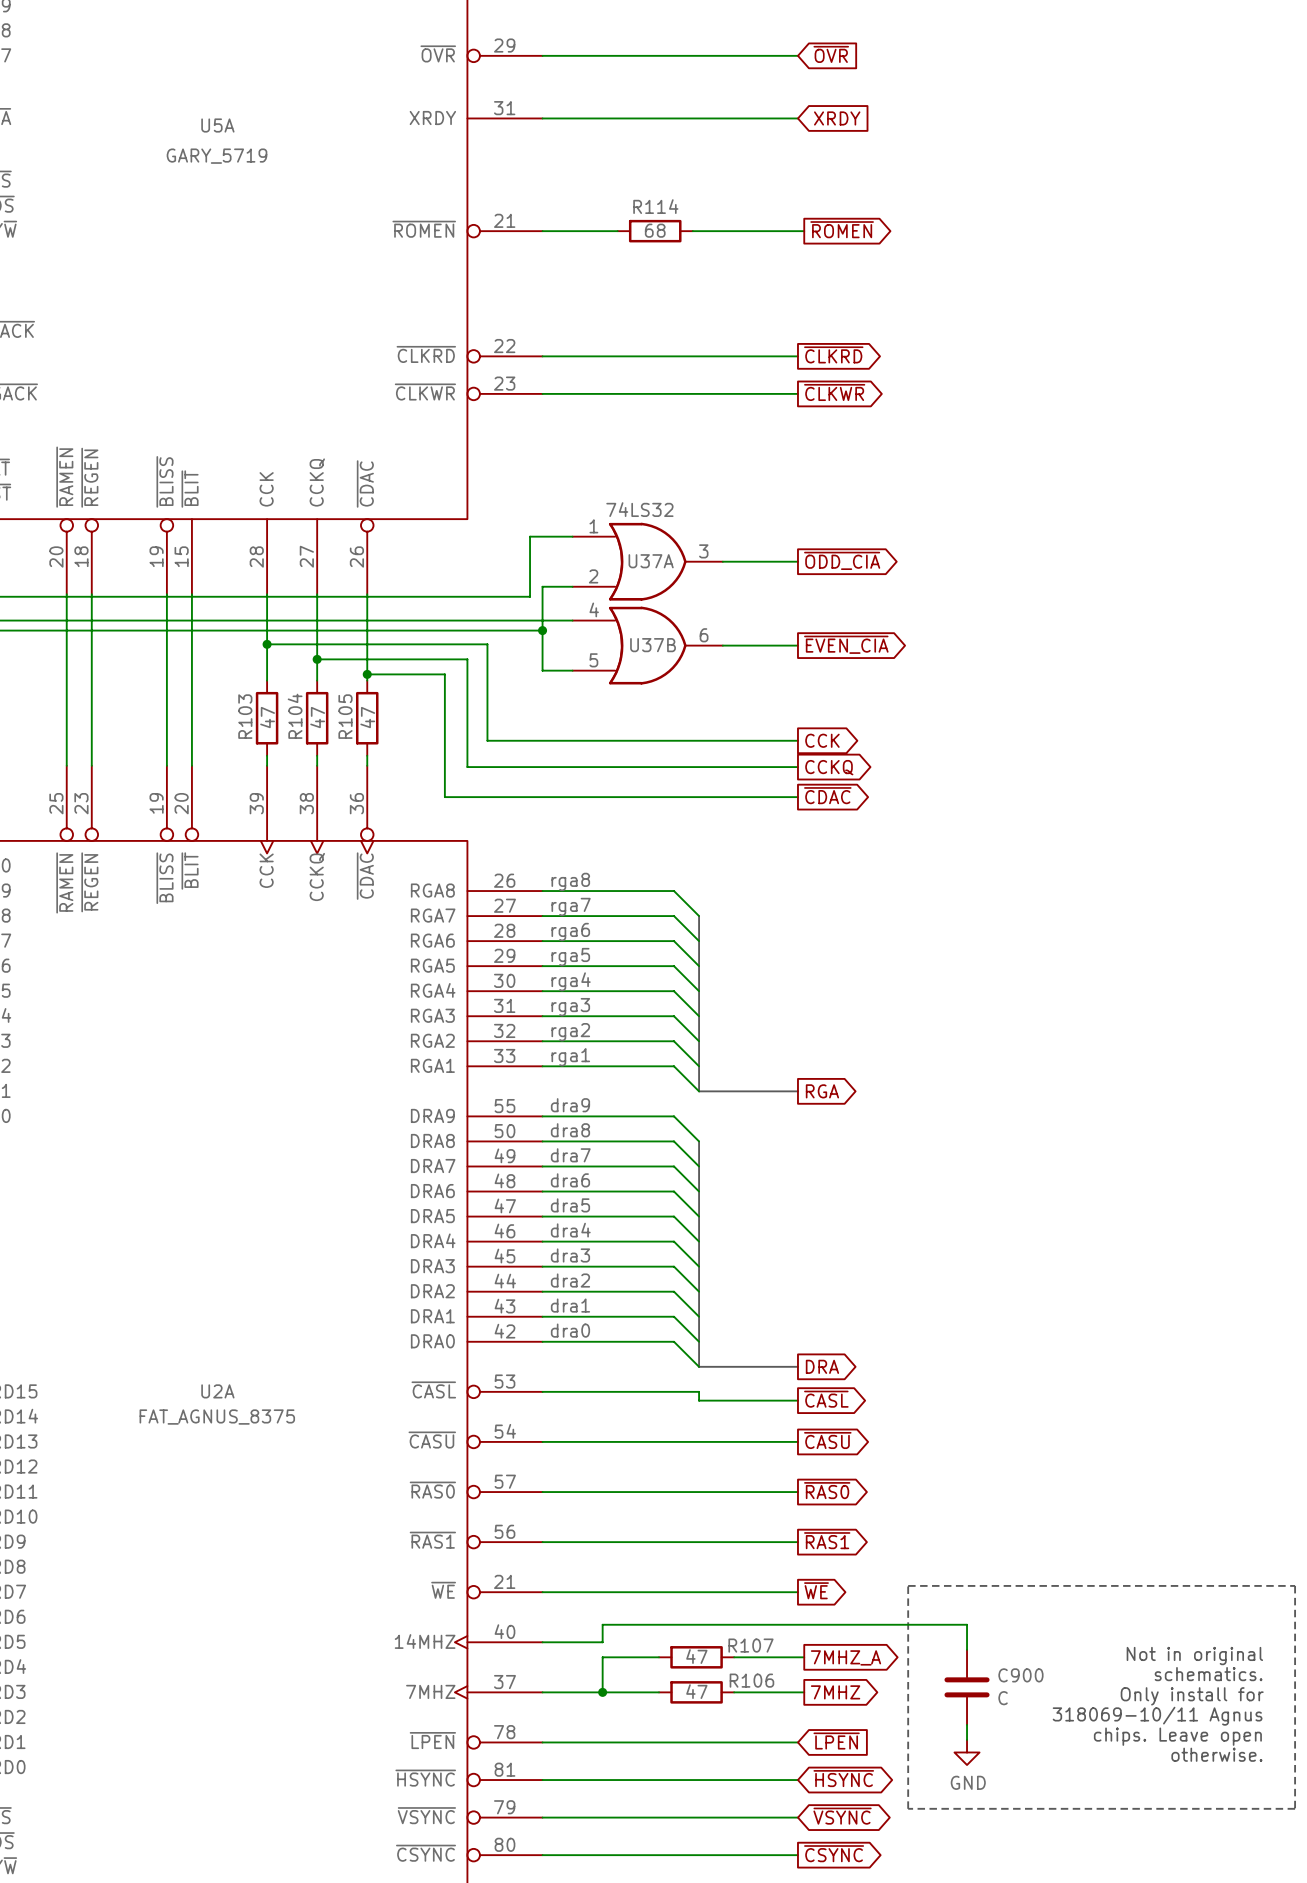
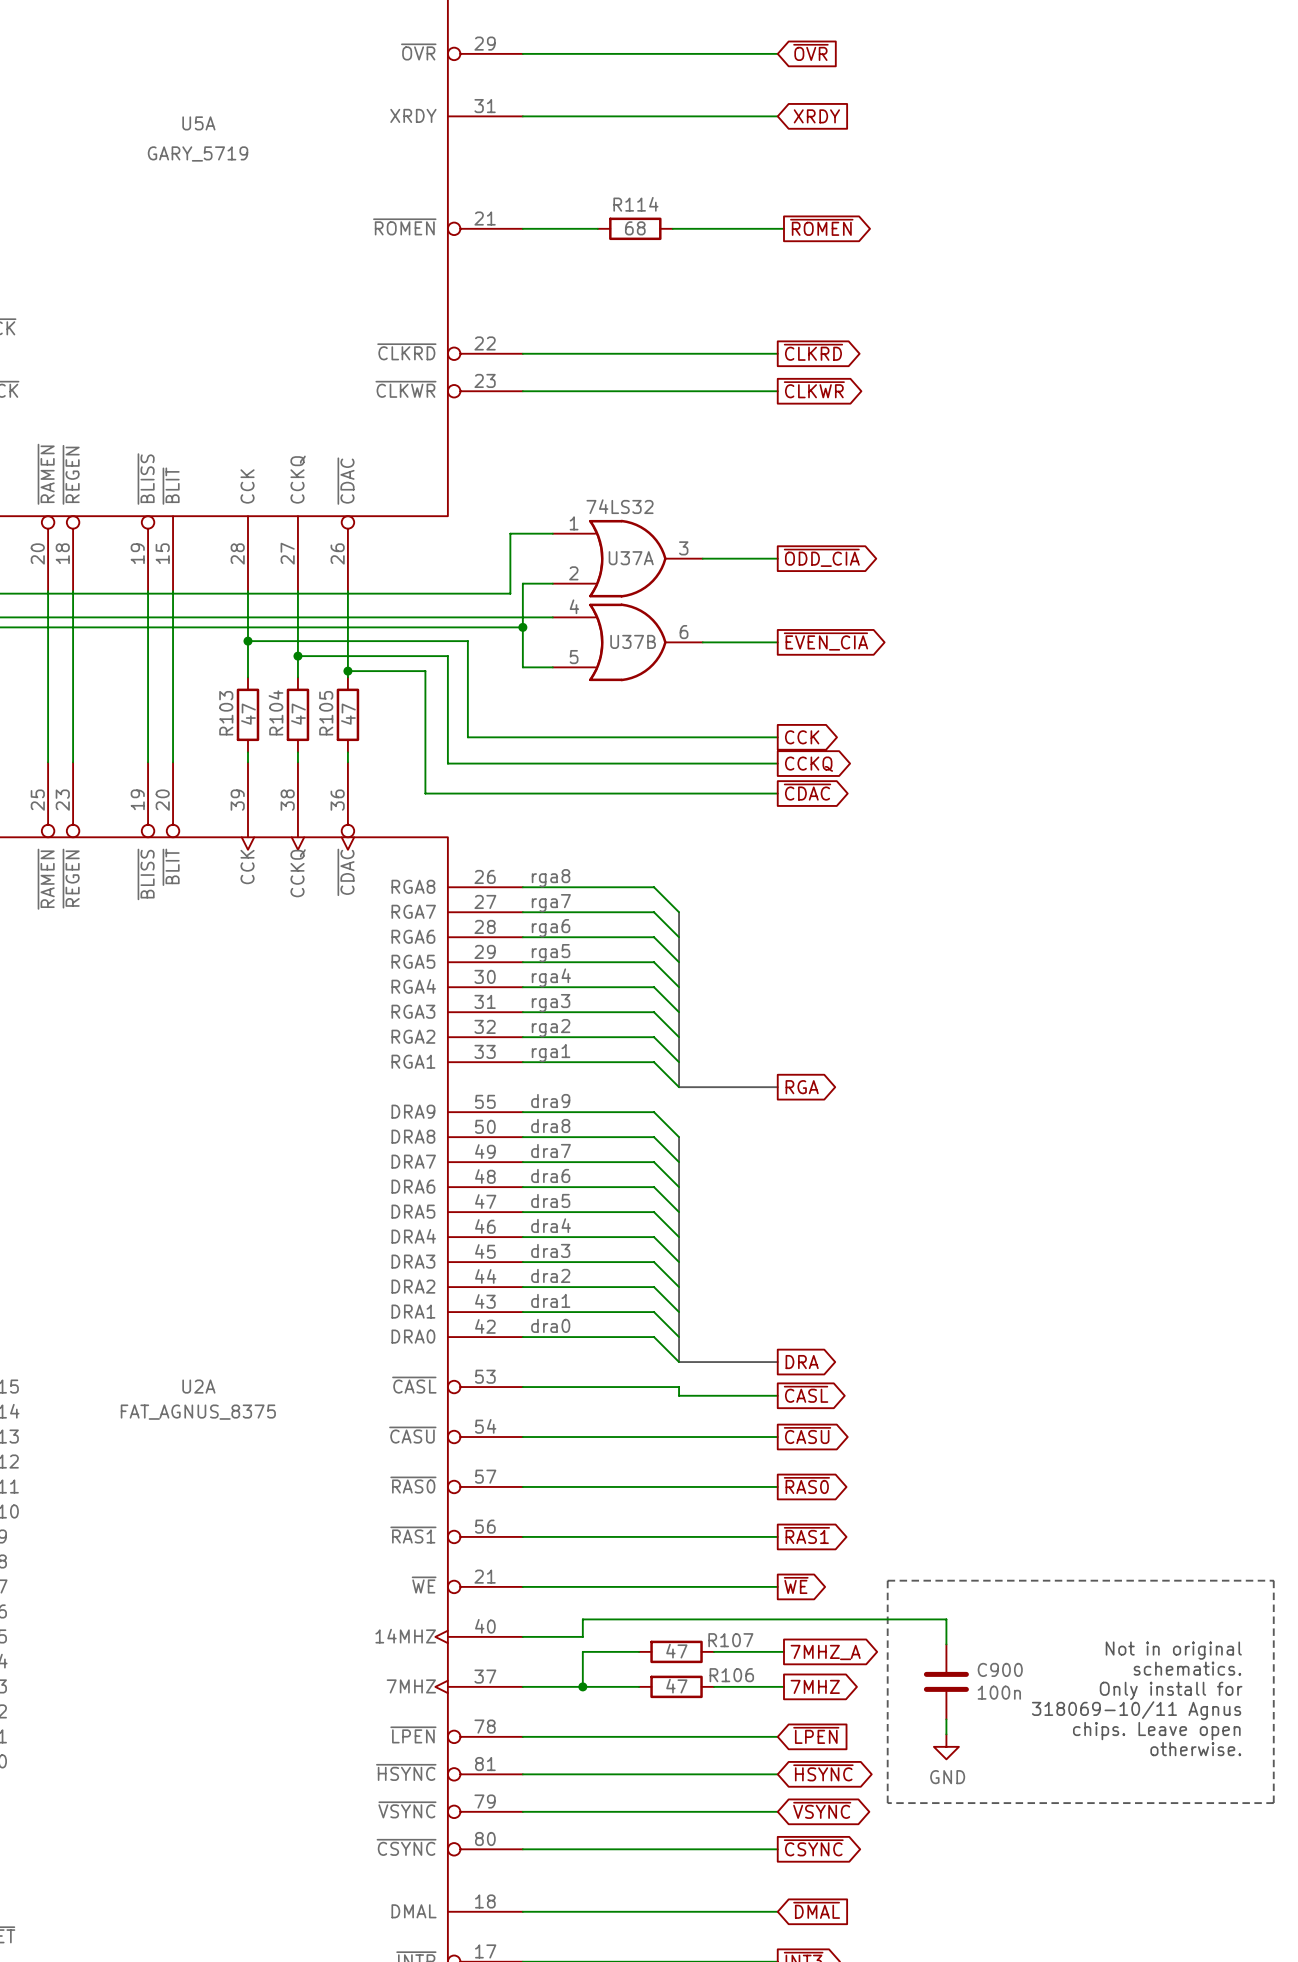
C900 value: C (1003, 1698) -> 100n (999, 1692)

